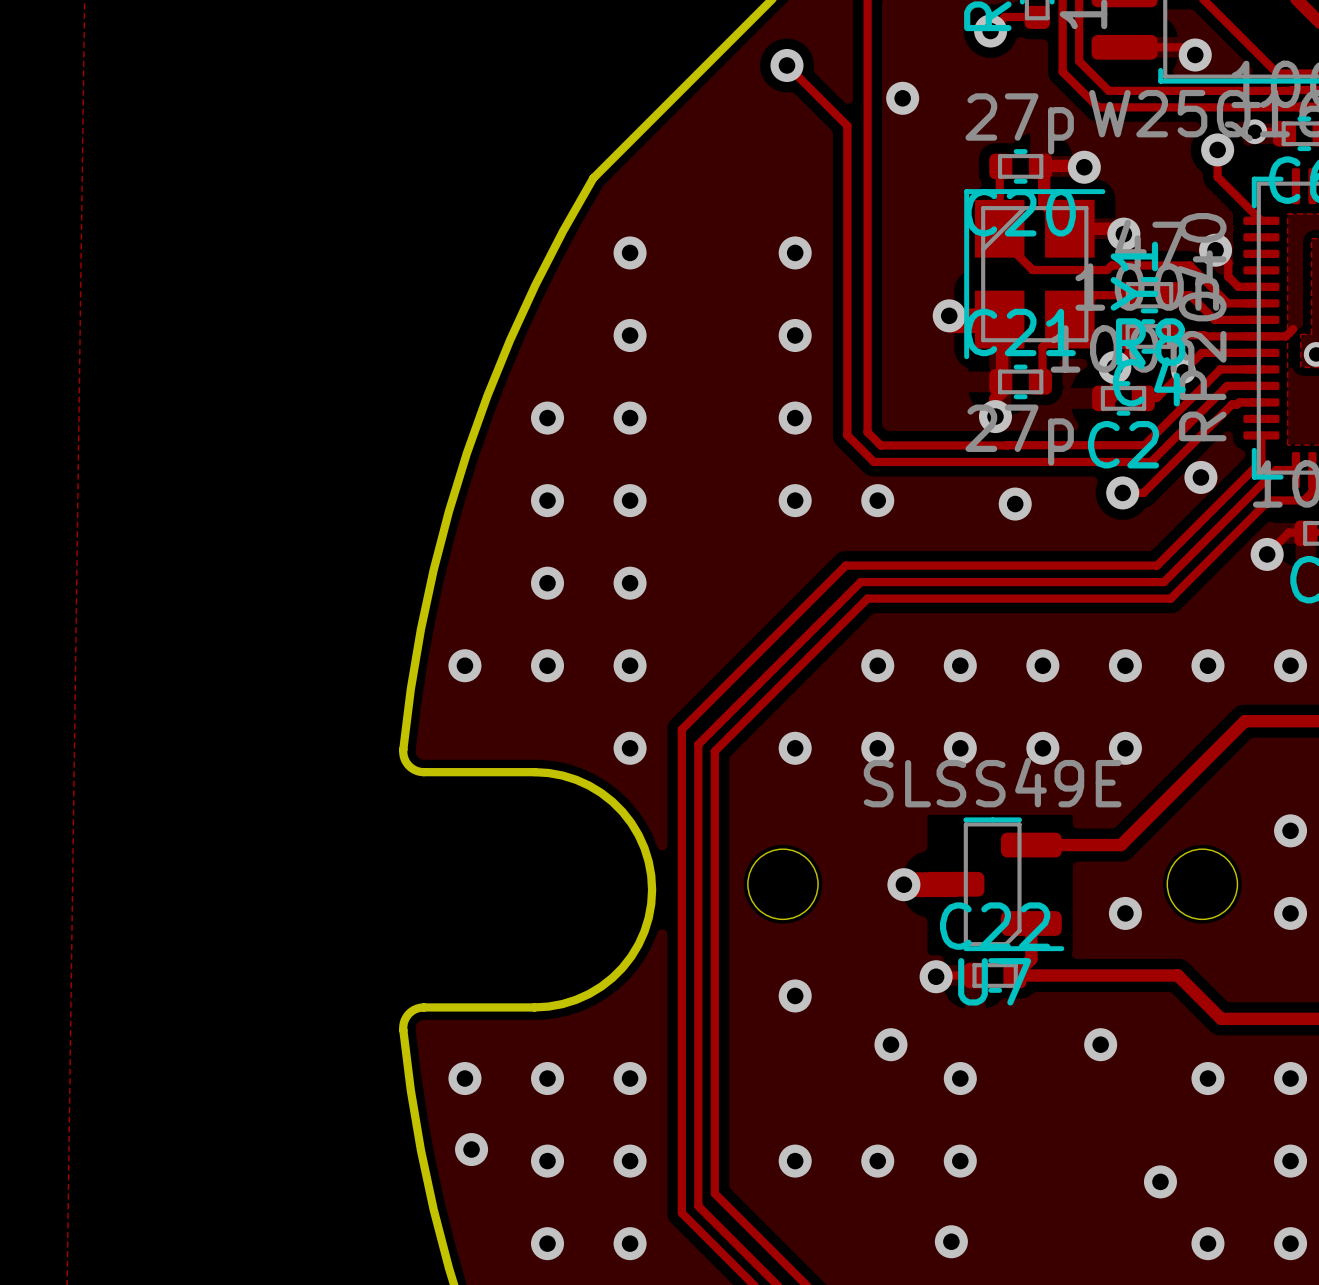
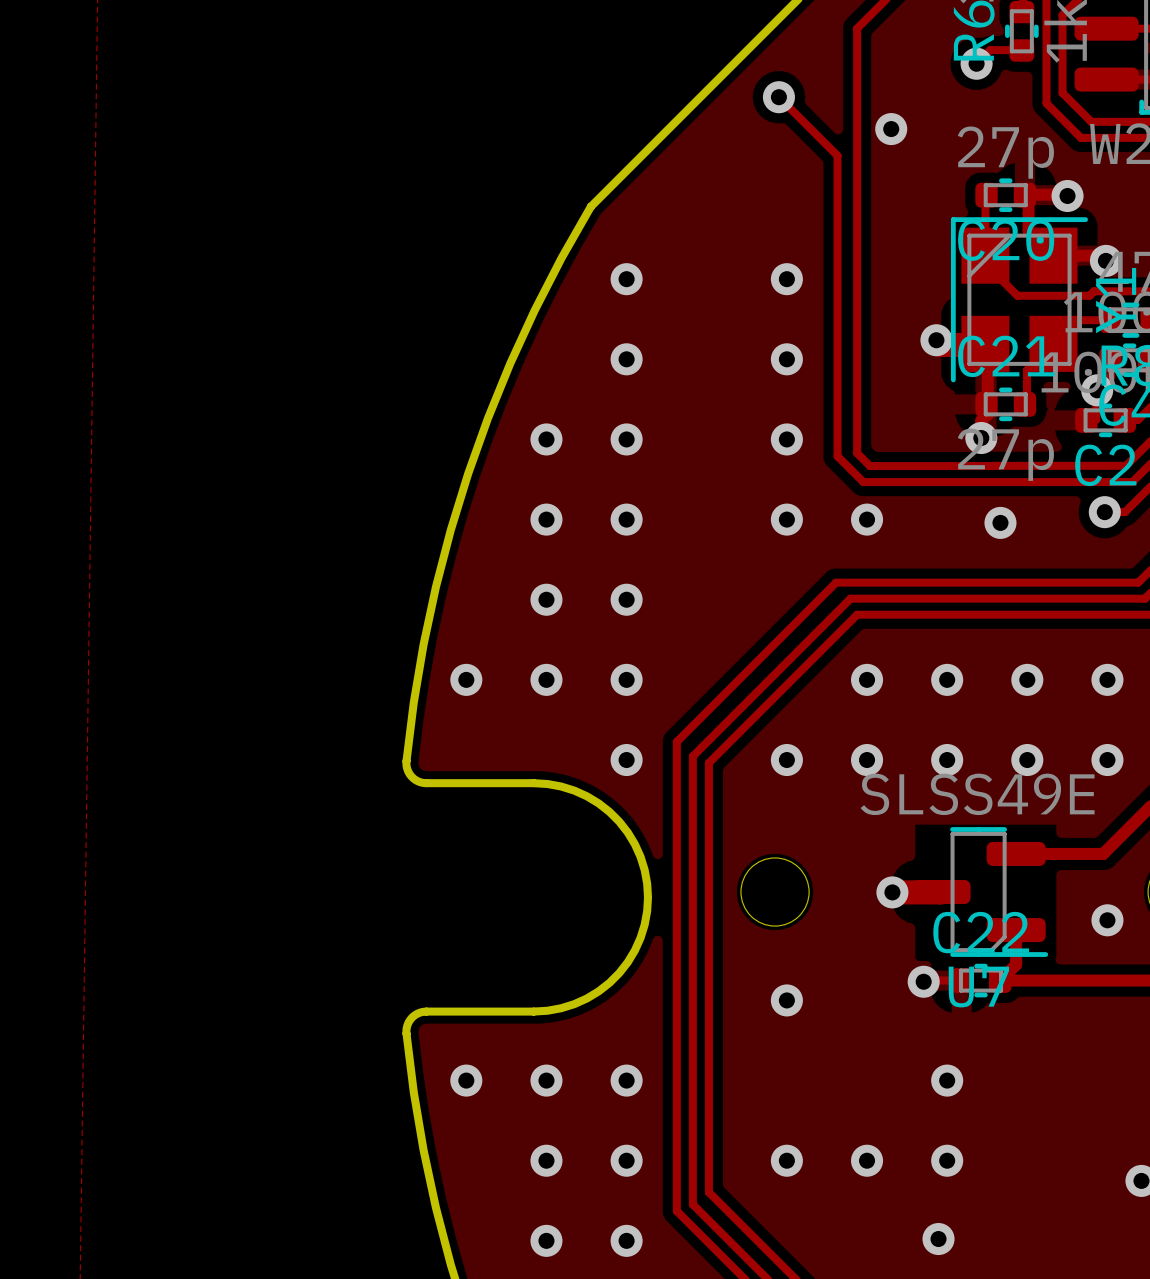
via: (890, 1044) -> none
via: (1100, 1044) -> none
via: (471, 1149) -> none

